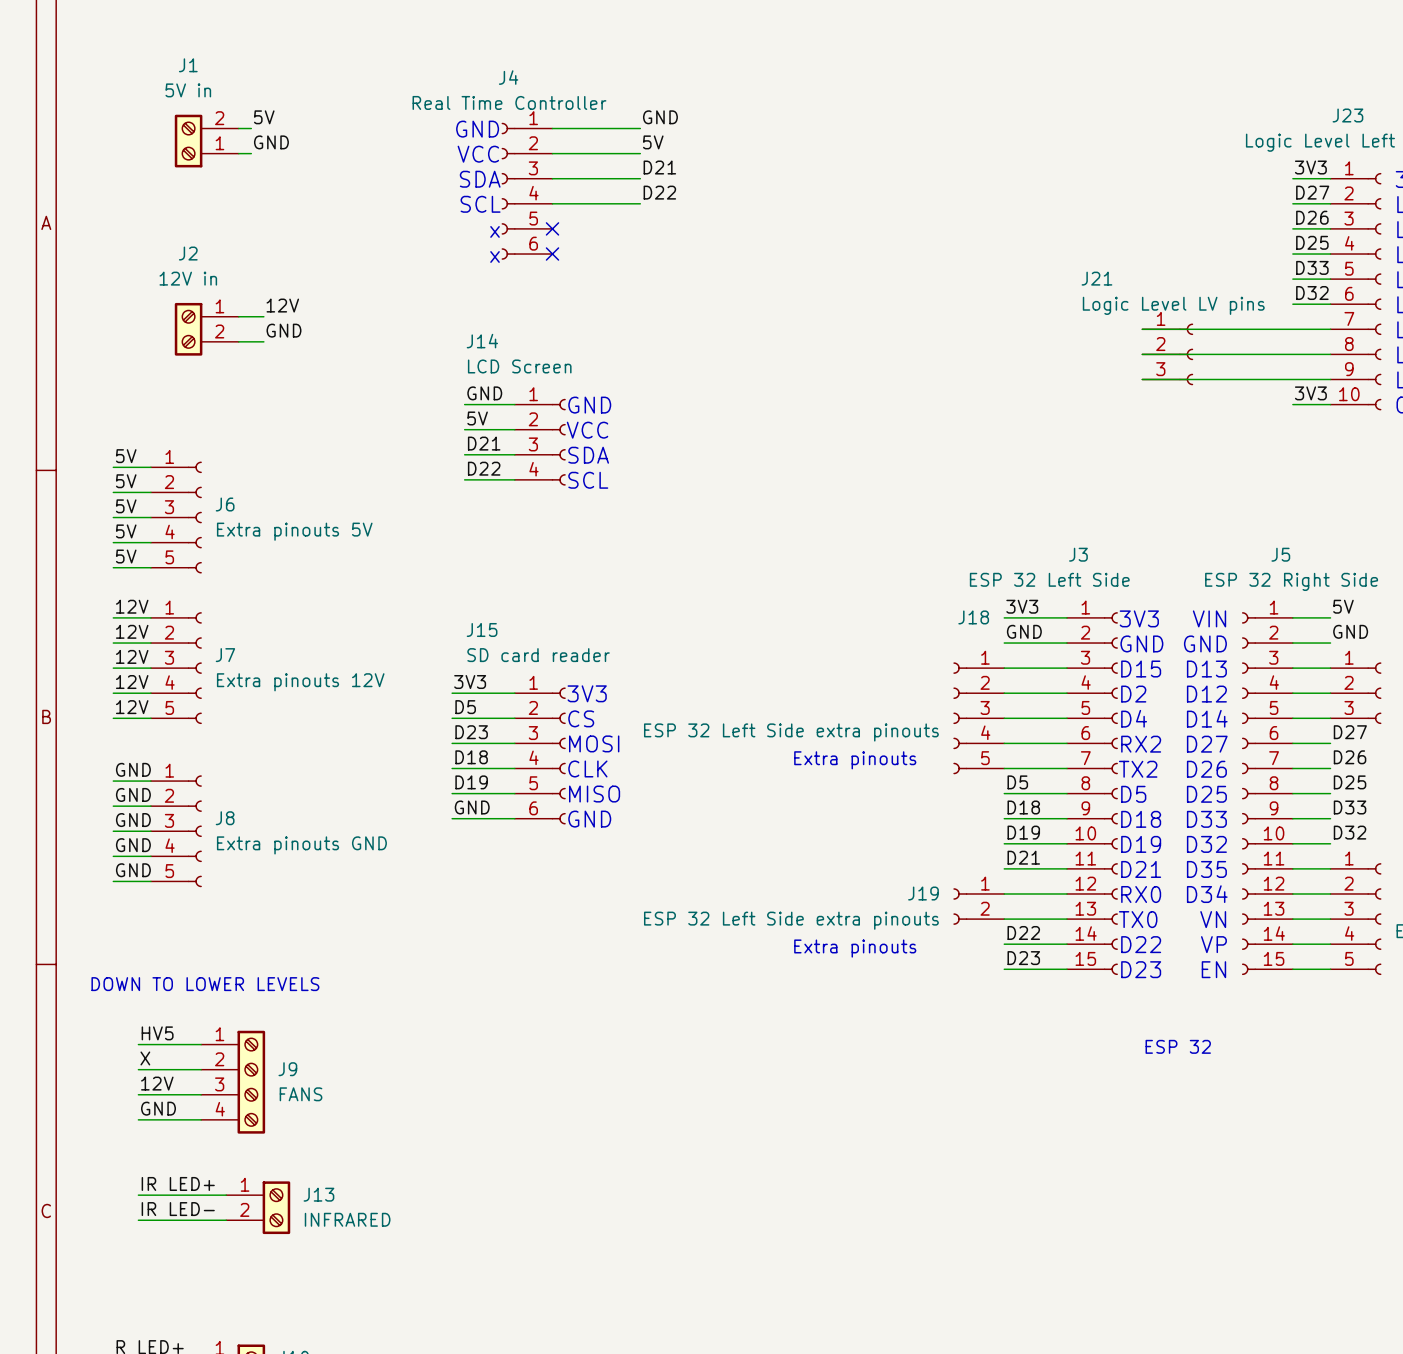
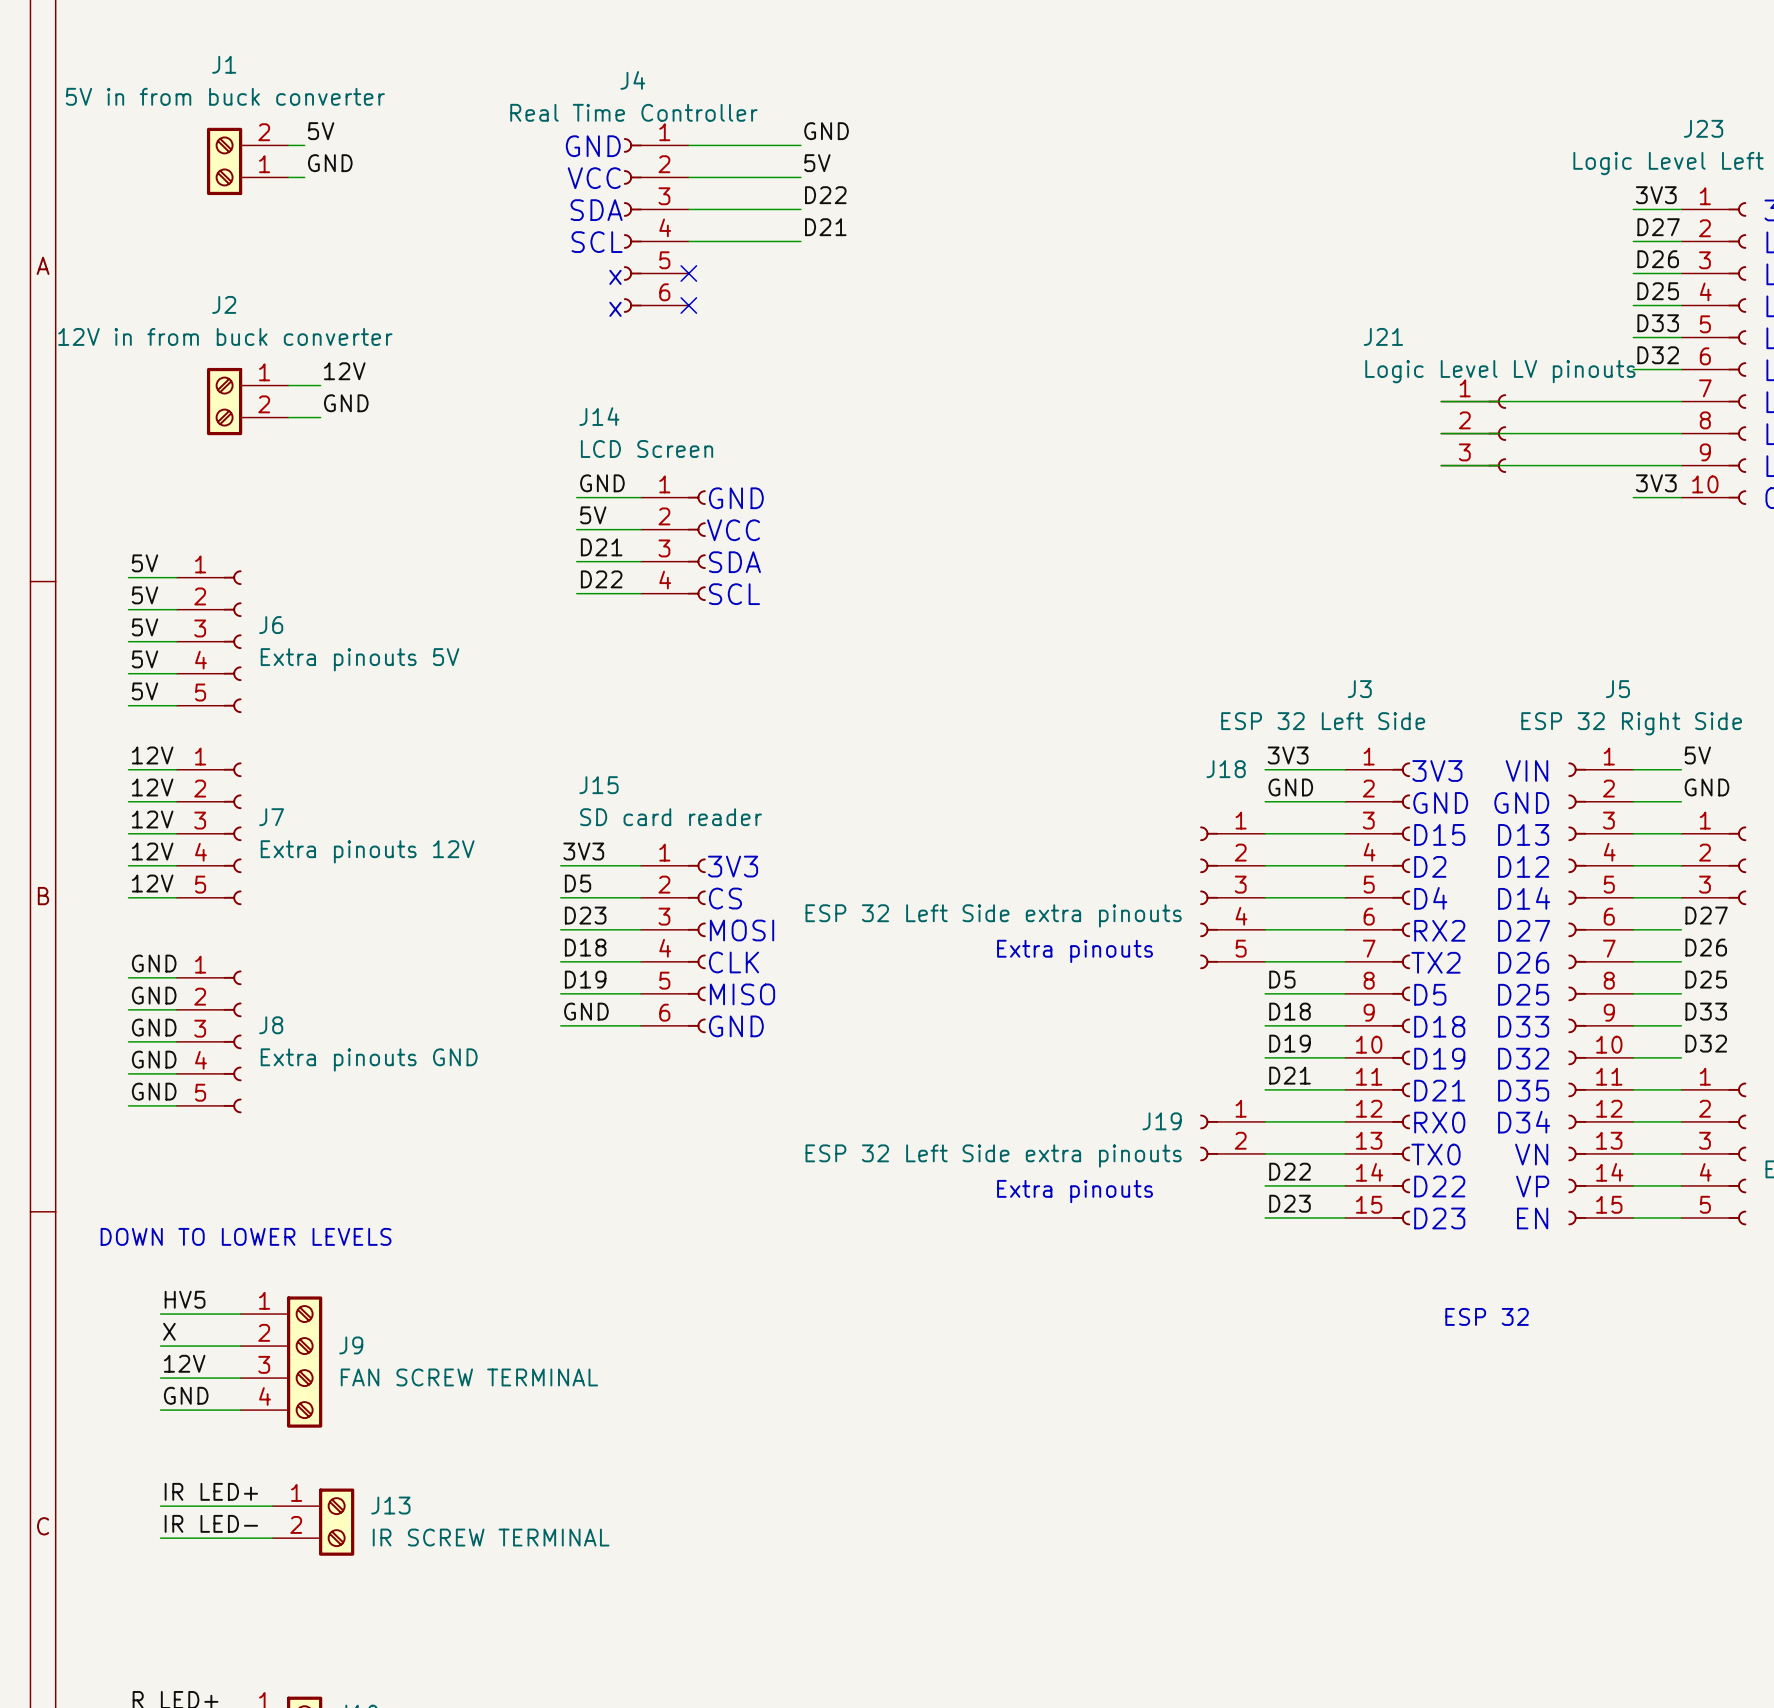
J1 value: 5V in (188, 90) -> 5V in from buck converter (225, 96)
label: D21 (659, 167) -> D22 (825, 195)
label: D22 (659, 192) -> D21 (825, 227)
J2 value: 12V in (188, 278) -> 12V in from buck converter (225, 336)
J21 value: Logic Level LV pins (1173, 305) -> Logic Level LV pinouts (1500, 371)
J9 value: FANS (301, 1094) -> FAN SCREW TERMINAL (469, 1377)
J13 value: INFRARED (347, 1219) -> IR SCREW TERMINAL (491, 1537)

